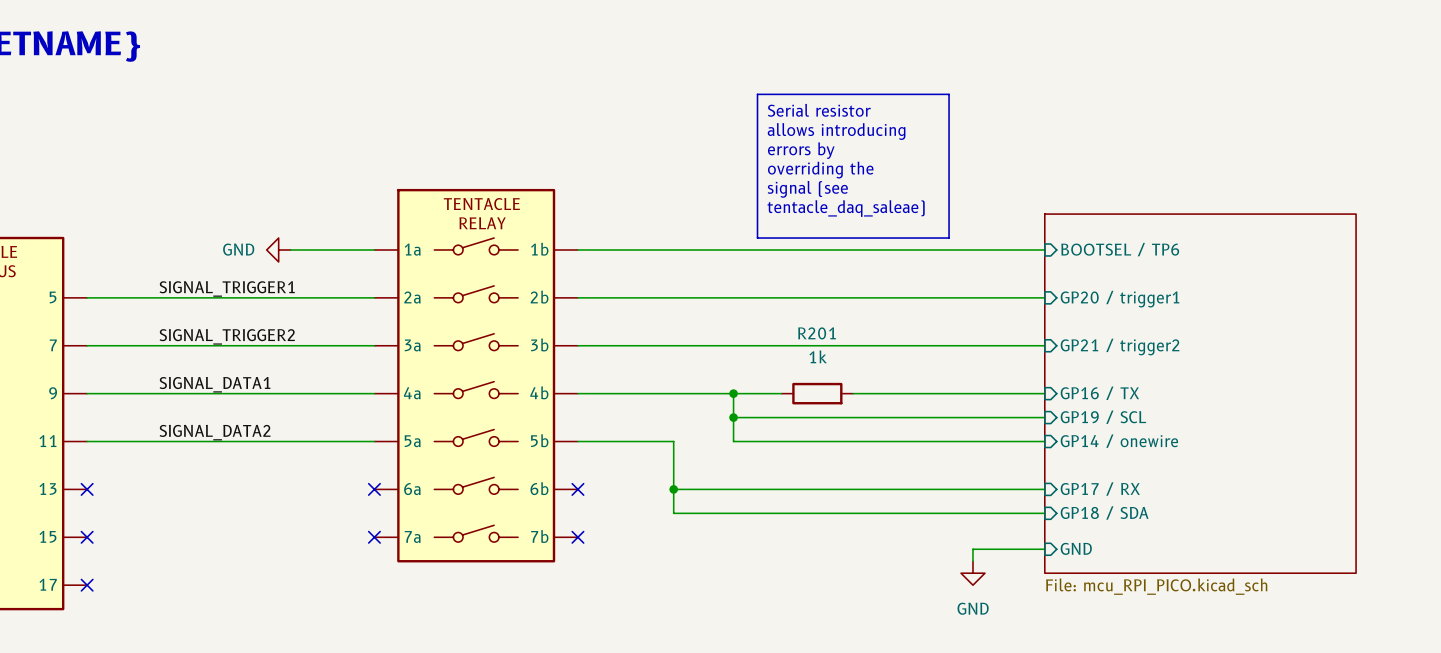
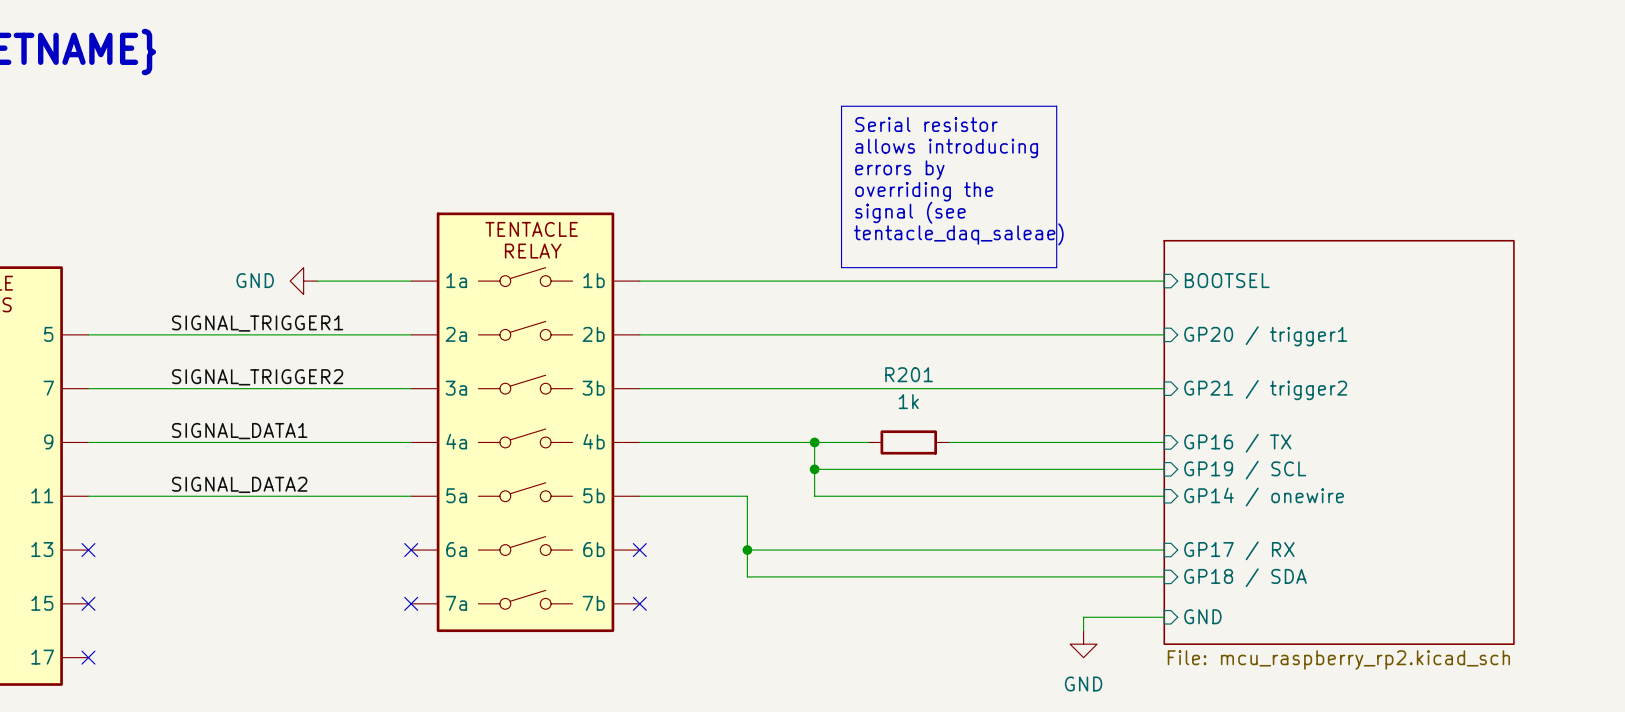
sheet pin: BOOTSEL / TP6 (1120, 249) -> BOOTSEL (1227, 280)
sheet value: File: mcu_RPI_PICO.kicad_sch (1156, 586) -> File: mcu_raspberry_rp2.kicad_sch (1338, 659)

